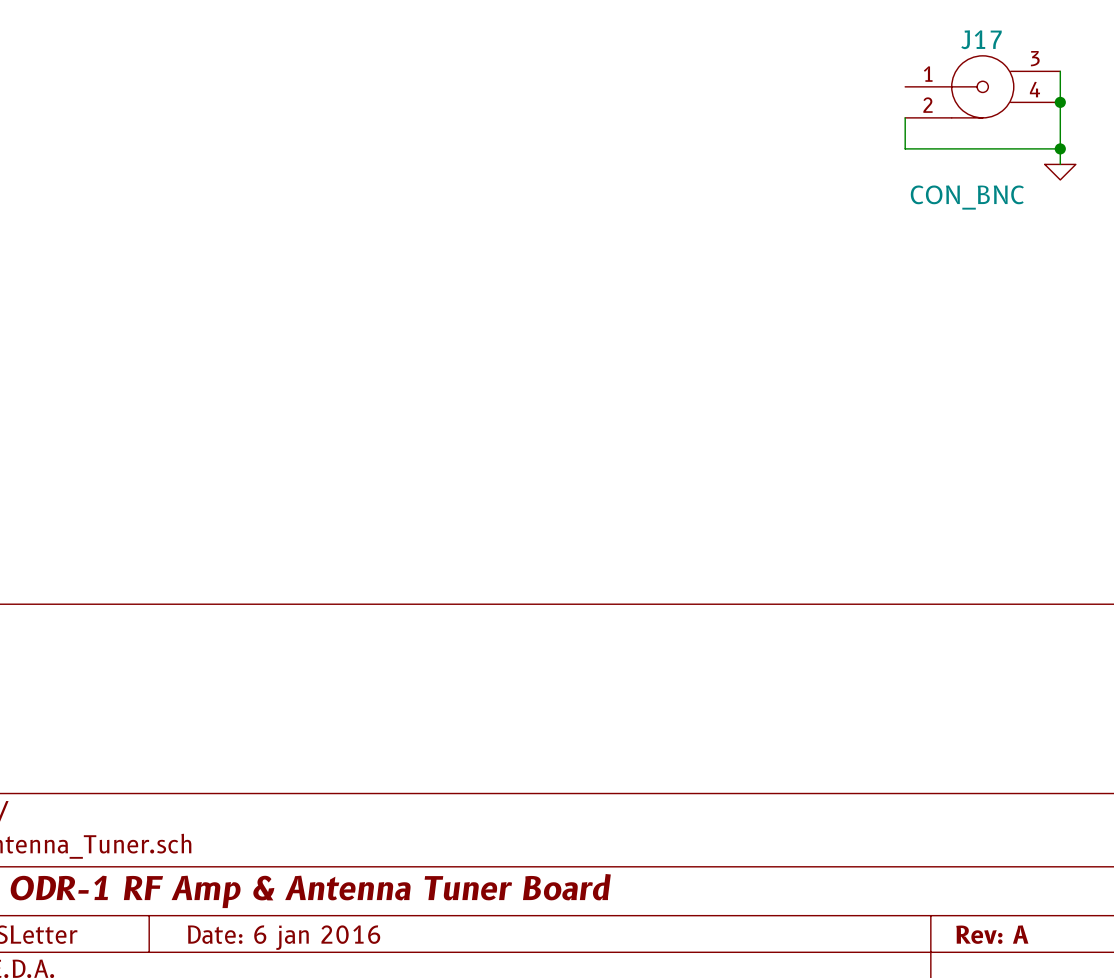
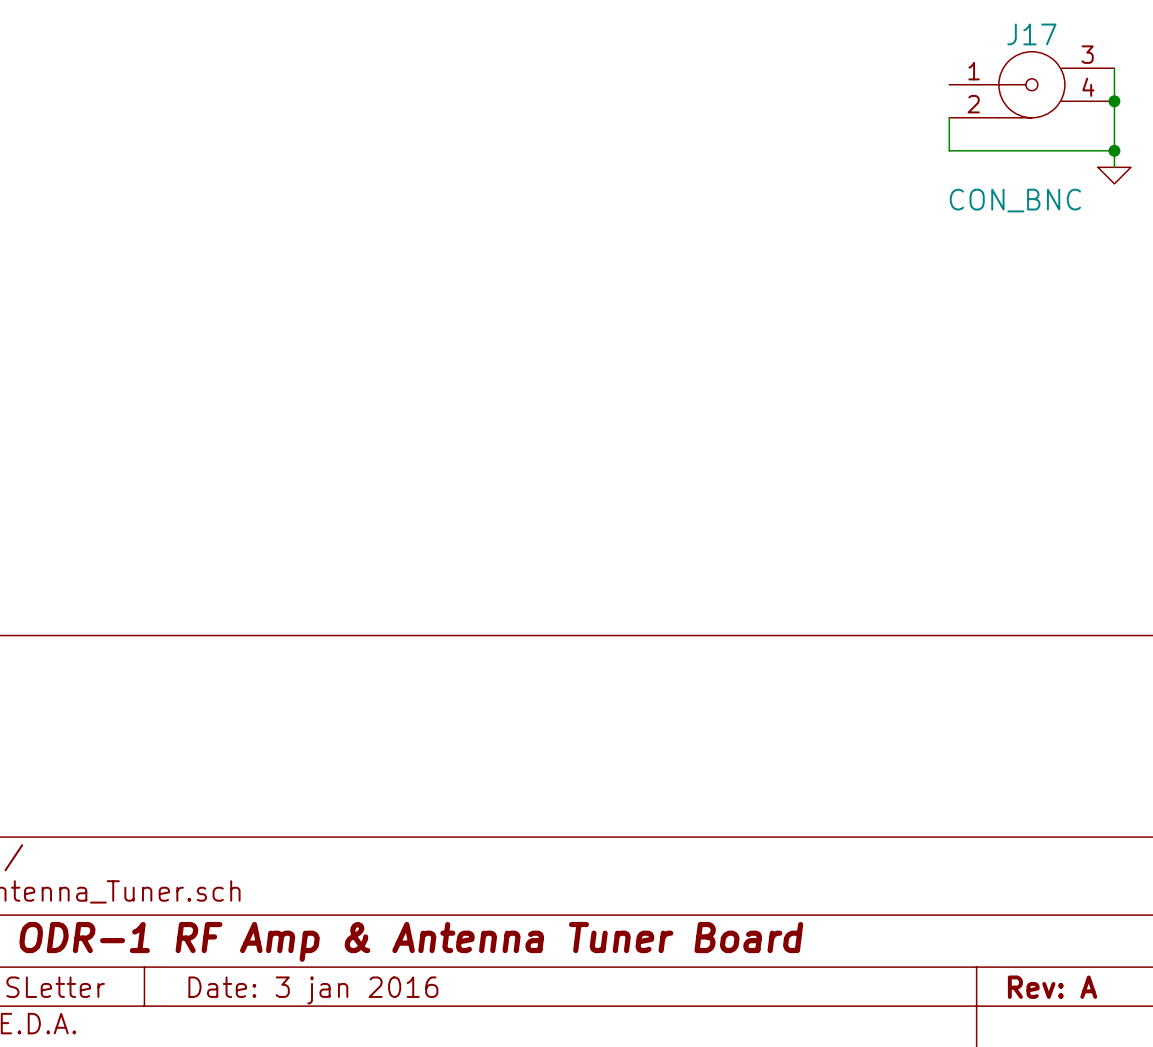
title block: Date: 6 jan 2016 (284, 937) -> Date: 3 jan 2016 (313, 990)

